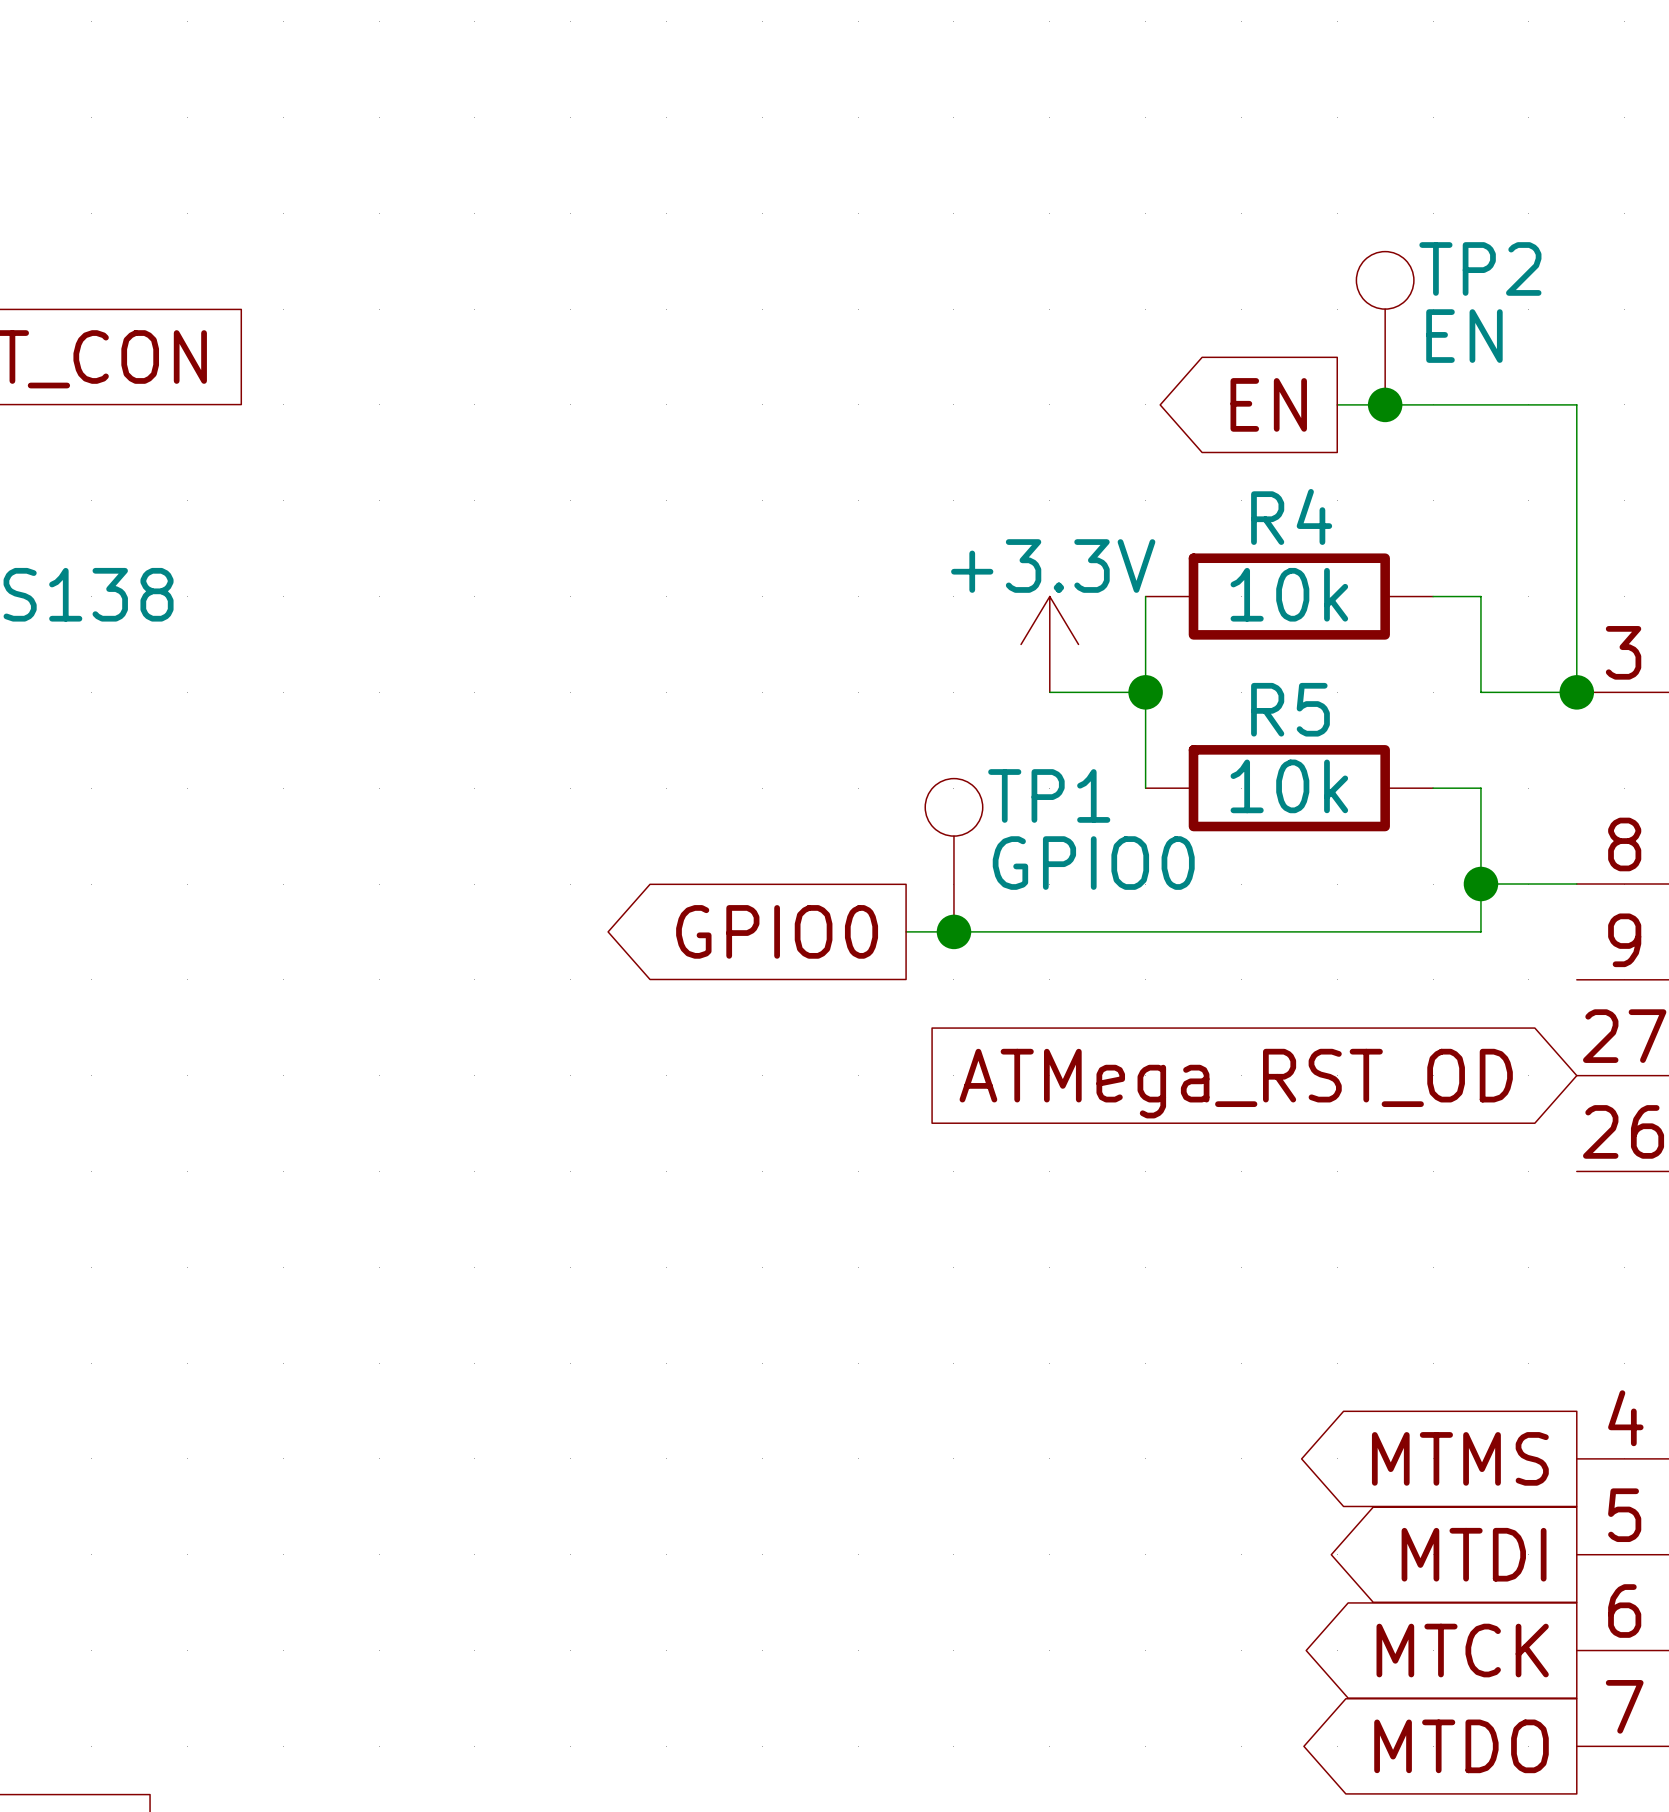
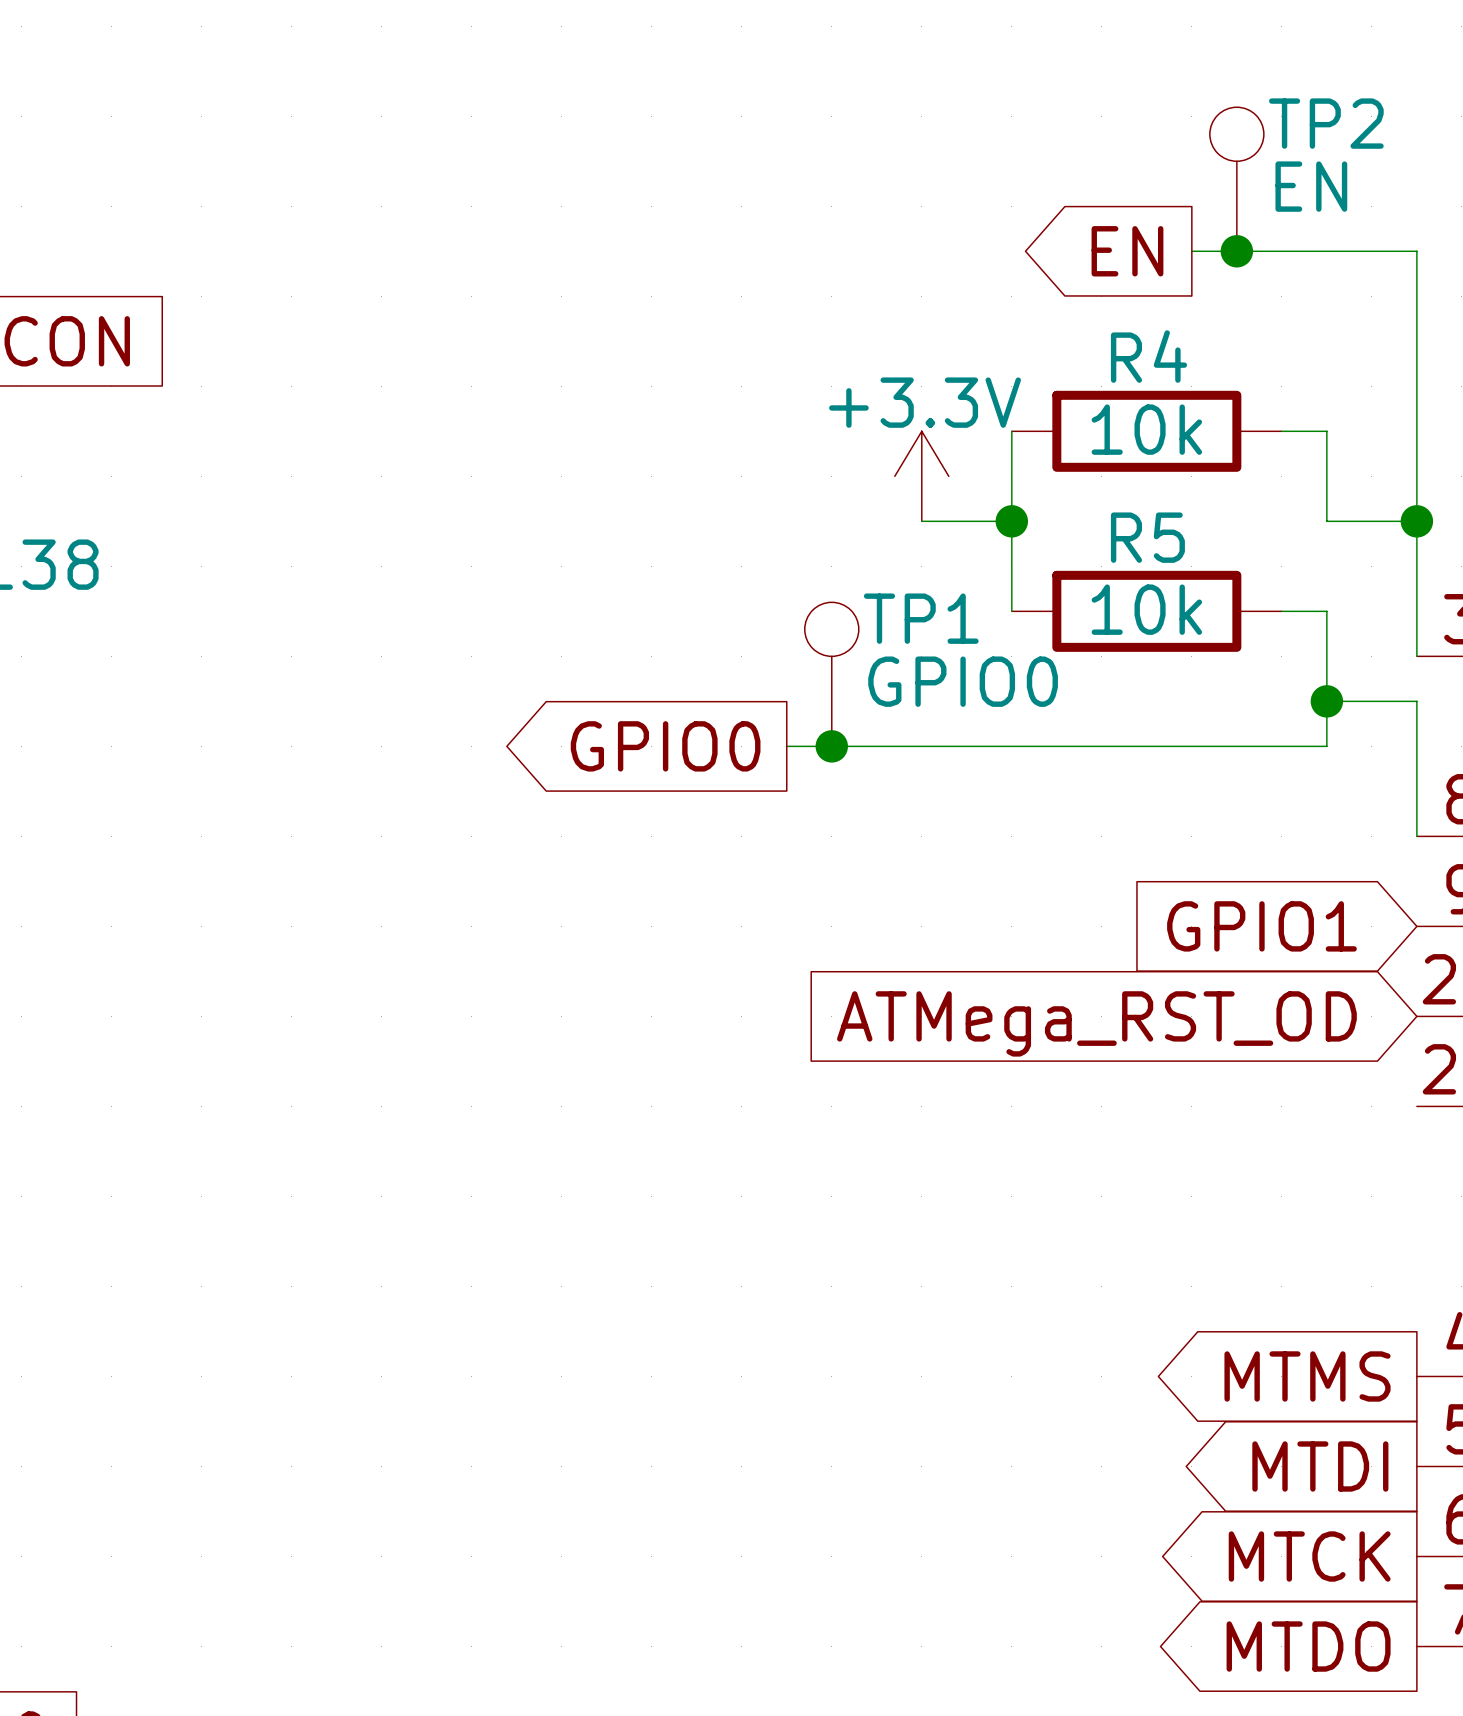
junction: none -> (1236, 251)
TP2 position: (1385, 328) -> (1236, 179)
global label position: EN (1268, 404) -> EN (1127, 251)
wire: (1337, 404) (1576, 404) -> (1191, 251) (1416, 251) (1416, 386)
junction: (1385, 404) -> none
wire: none -> (1281, 431) (1326, 431) (1326, 521) (1416, 521)
junction: none -> (1011, 521)
junction: none -> (1416, 521)
R4 position: (1289, 596) -> (1146, 431)
wire: (1433, 596) (1480, 596) (1480, 644) -> (1281, 611) (1326, 611)
power symbol position: +3.3V (1049, 644) -> +3.3V (921, 476)
wire: (1145, 644) (1145, 788) -> (1011, 431) (1011, 566)
wire: (1049, 692) (1145, 692) -> (921, 521) (1011, 521)
junction: (1145, 692) -> none
wire: (1480, 692) (1576, 692) -> (1326, 656) (1326, 746)
junction: (1576, 692) -> none
junction: none -> (1326, 701)
wire: none -> (786, 746) (1281, 746)
junction: none -> (831, 746)
R5 position: (1289, 788) -> (1146, 611)
wire: (1480, 788) (1480, 931) (906, 931) -> none
TP1 position: (953, 855) -> (831, 674)
wire: (1480, 884) (1576, 884) -> (1326, 701) (1416, 701) (1416, 836)
junction: (1480, 884) -> none
global label position: GPIO0 (777, 931) -> GPIO0 (665, 746)
junction: (953, 931) -> none
global label: none -> GPIO1 (1261, 926)

